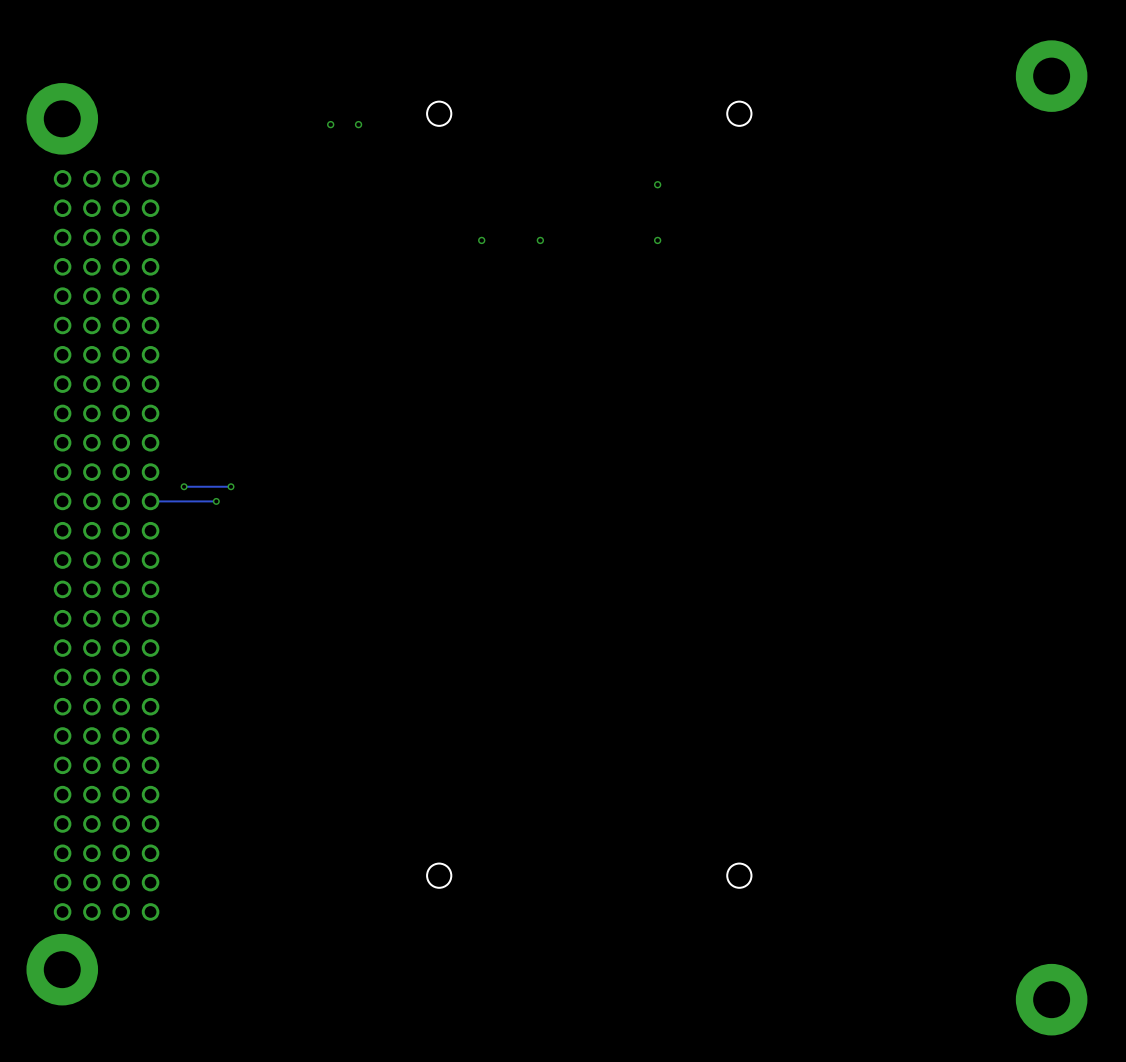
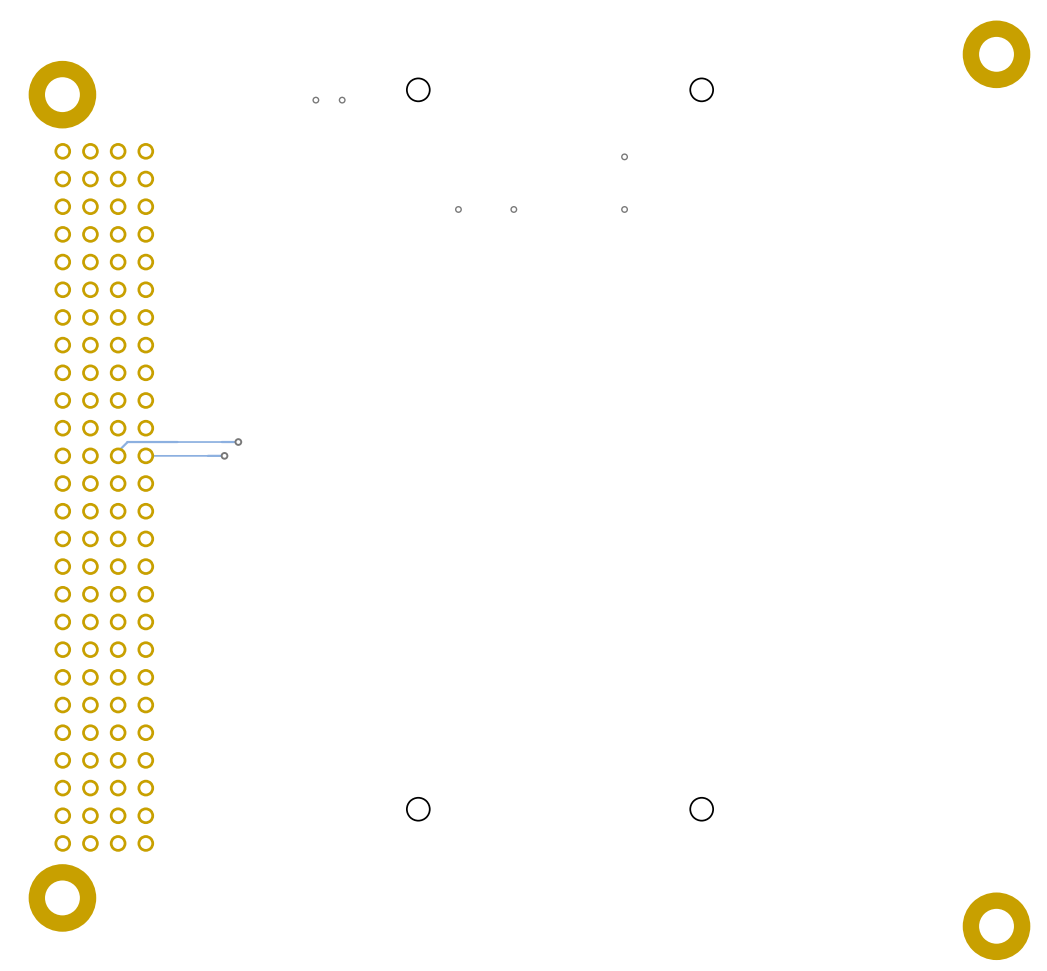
track: none -> (177, 442) (127, 442) (118, 451) (118, 455)
via: (184, 486) -> none
via: (230, 486) -> none
track: none -> (238, 442) (221, 442)
via: none -> (238, 442)
via: (216, 501) -> none
track: none -> (224, 455) (207, 455)
via: none -> (224, 455)

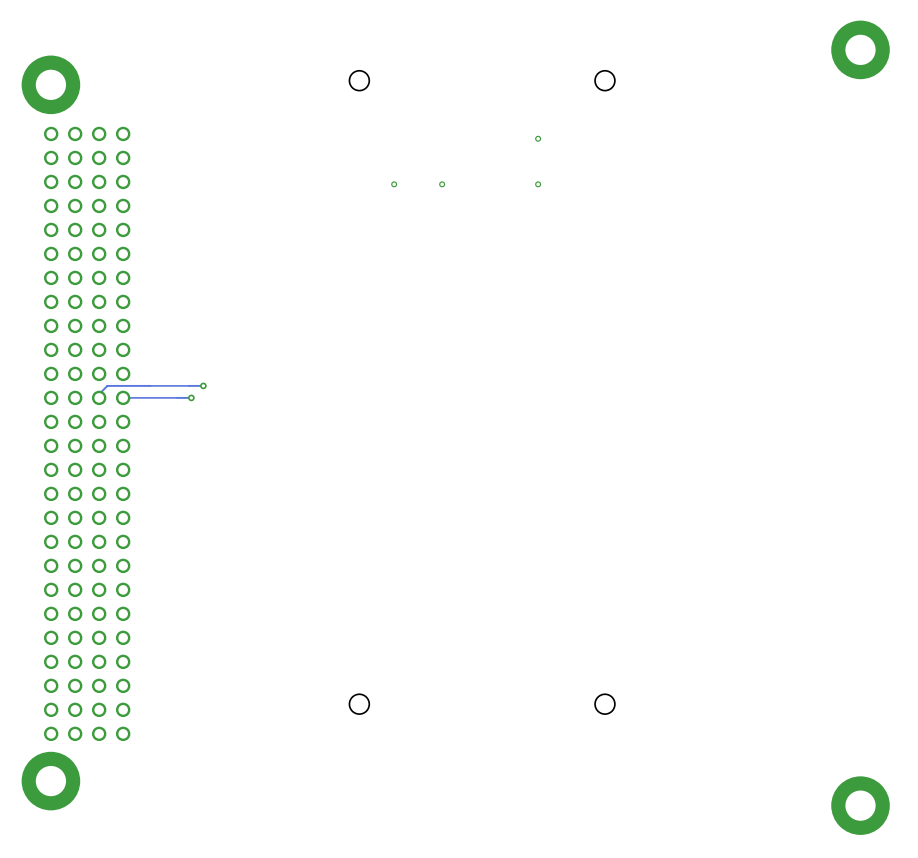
via: (315, 100) -> none
via: (342, 100) -> none

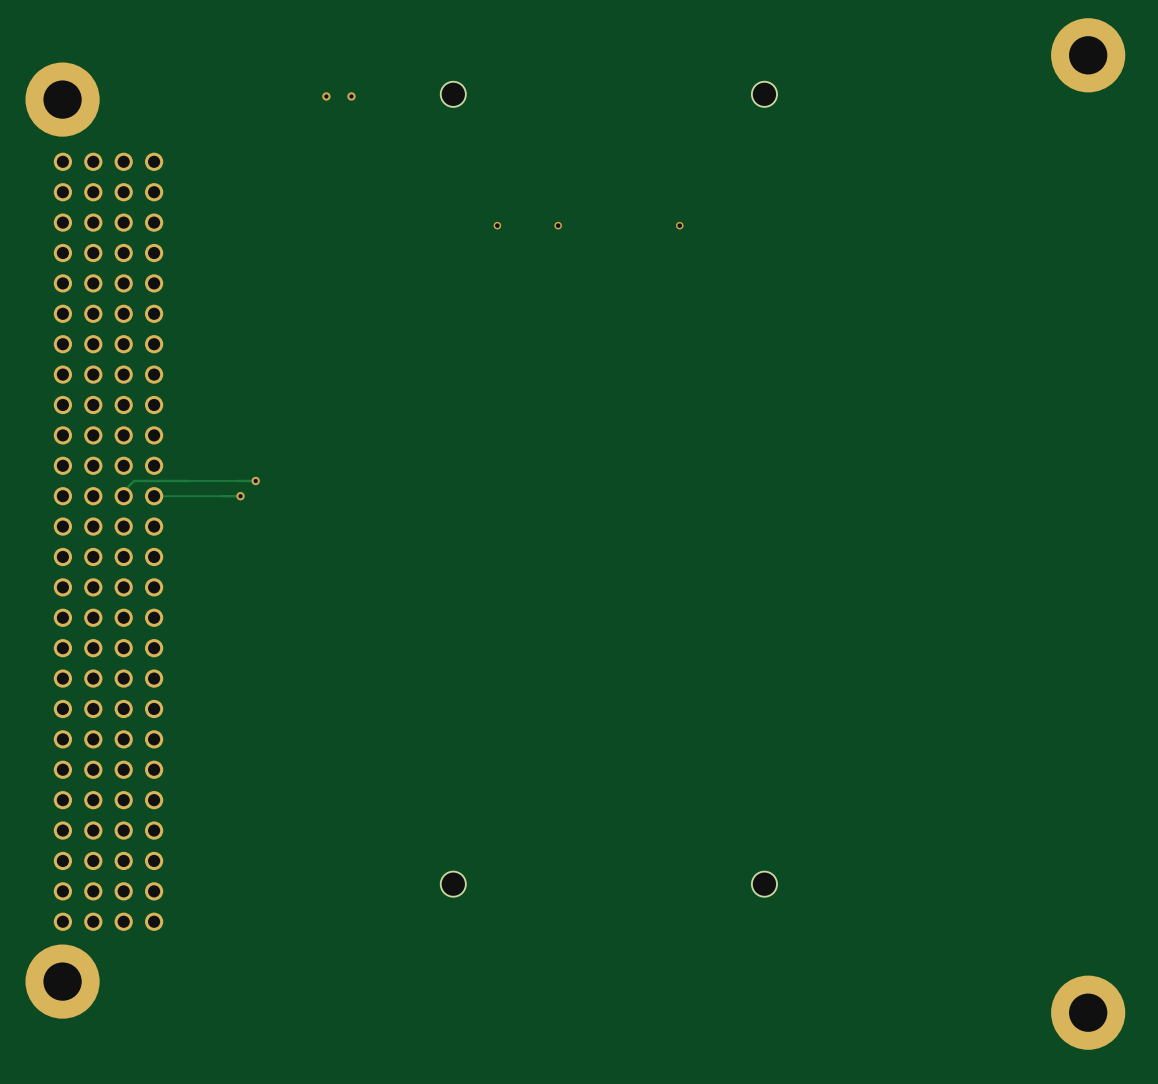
via: none -> (326, 96)
via: none -> (351, 96)
via: (538, 138) -> none

